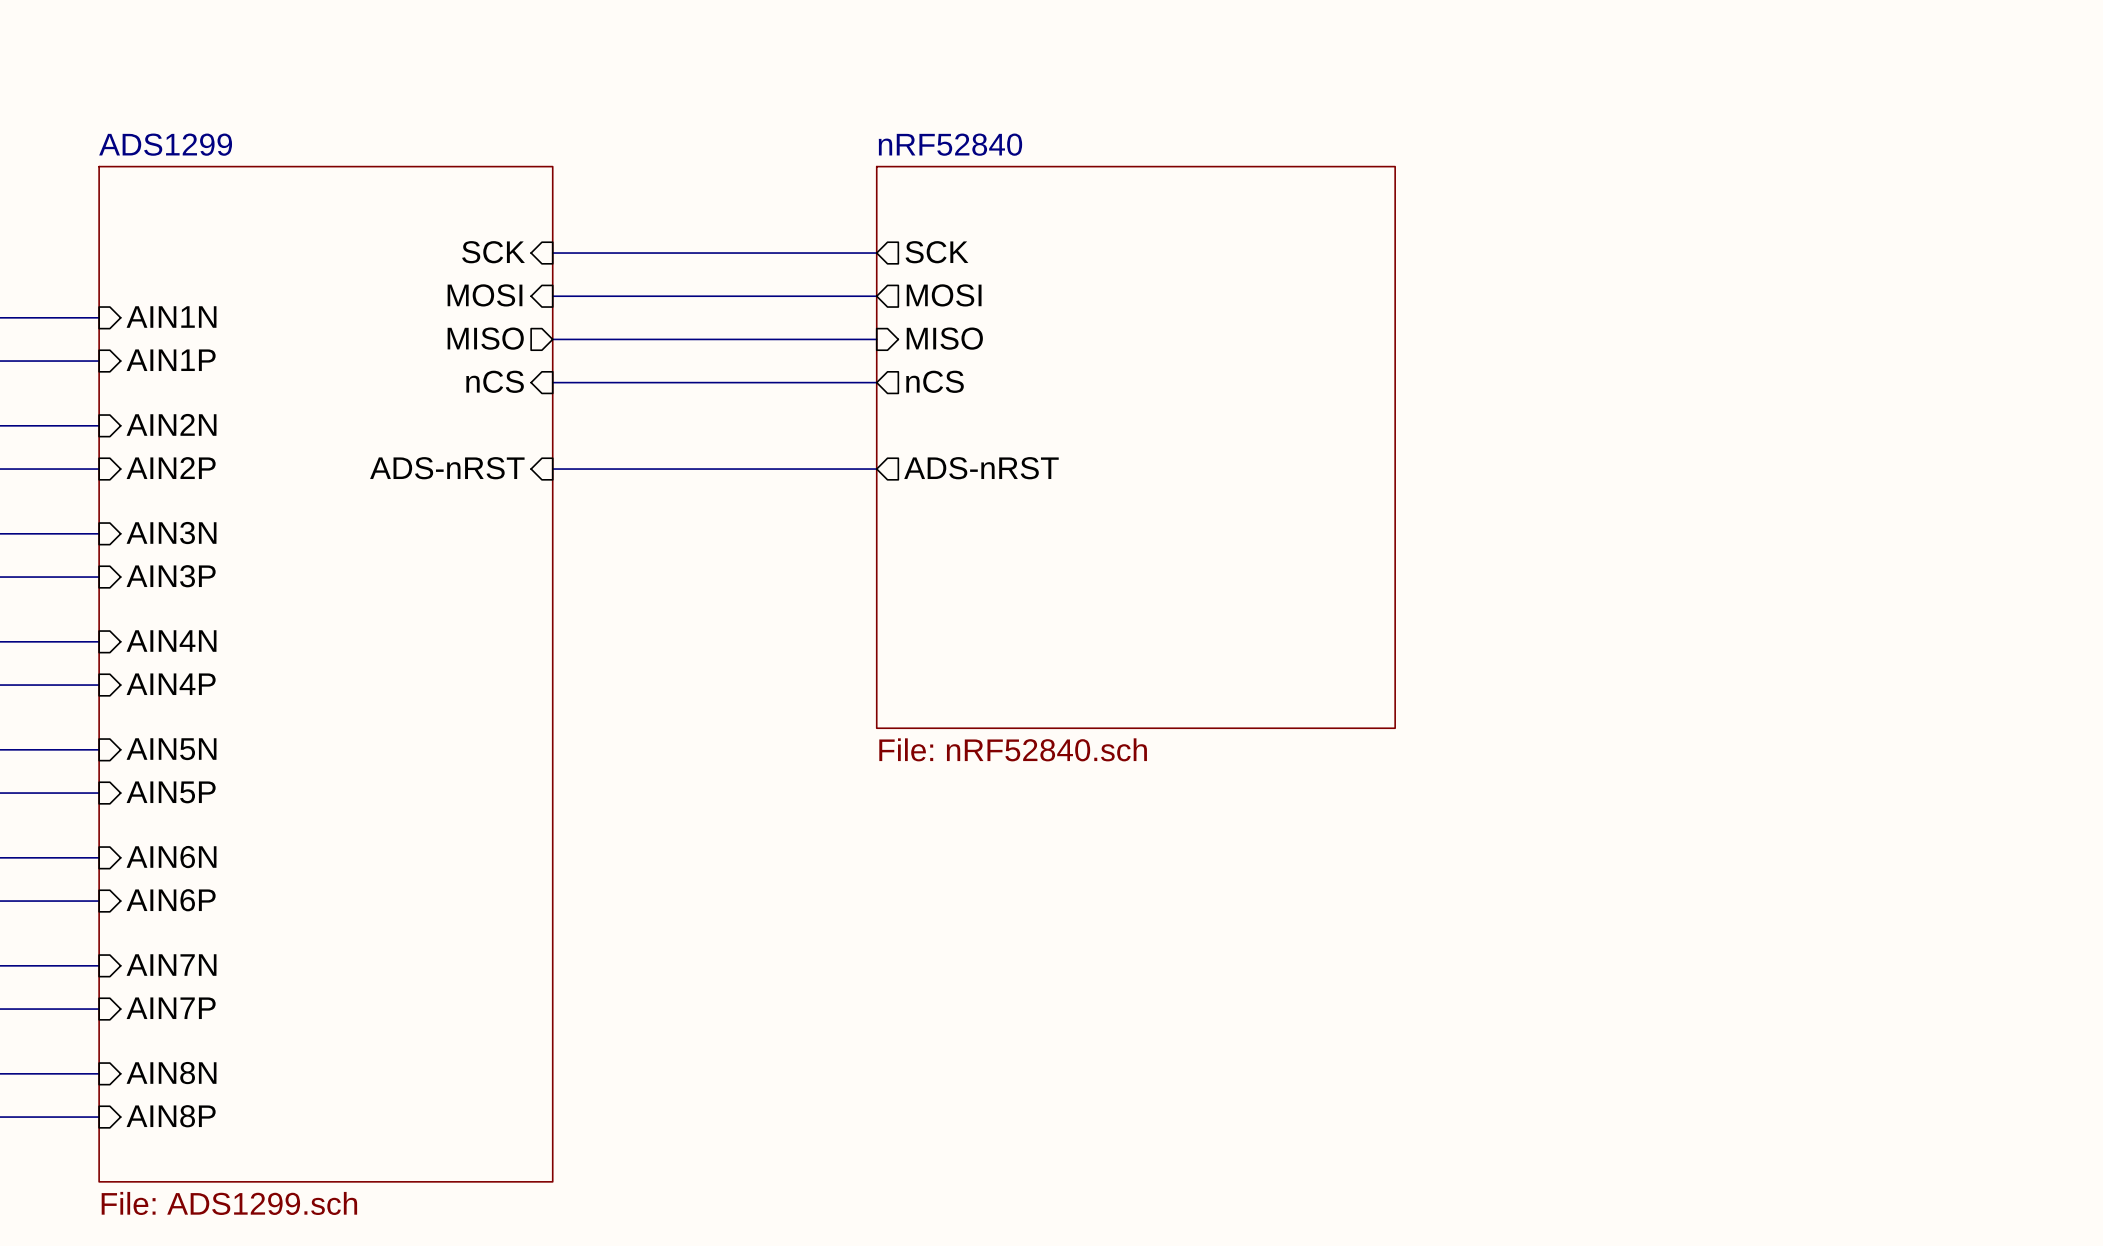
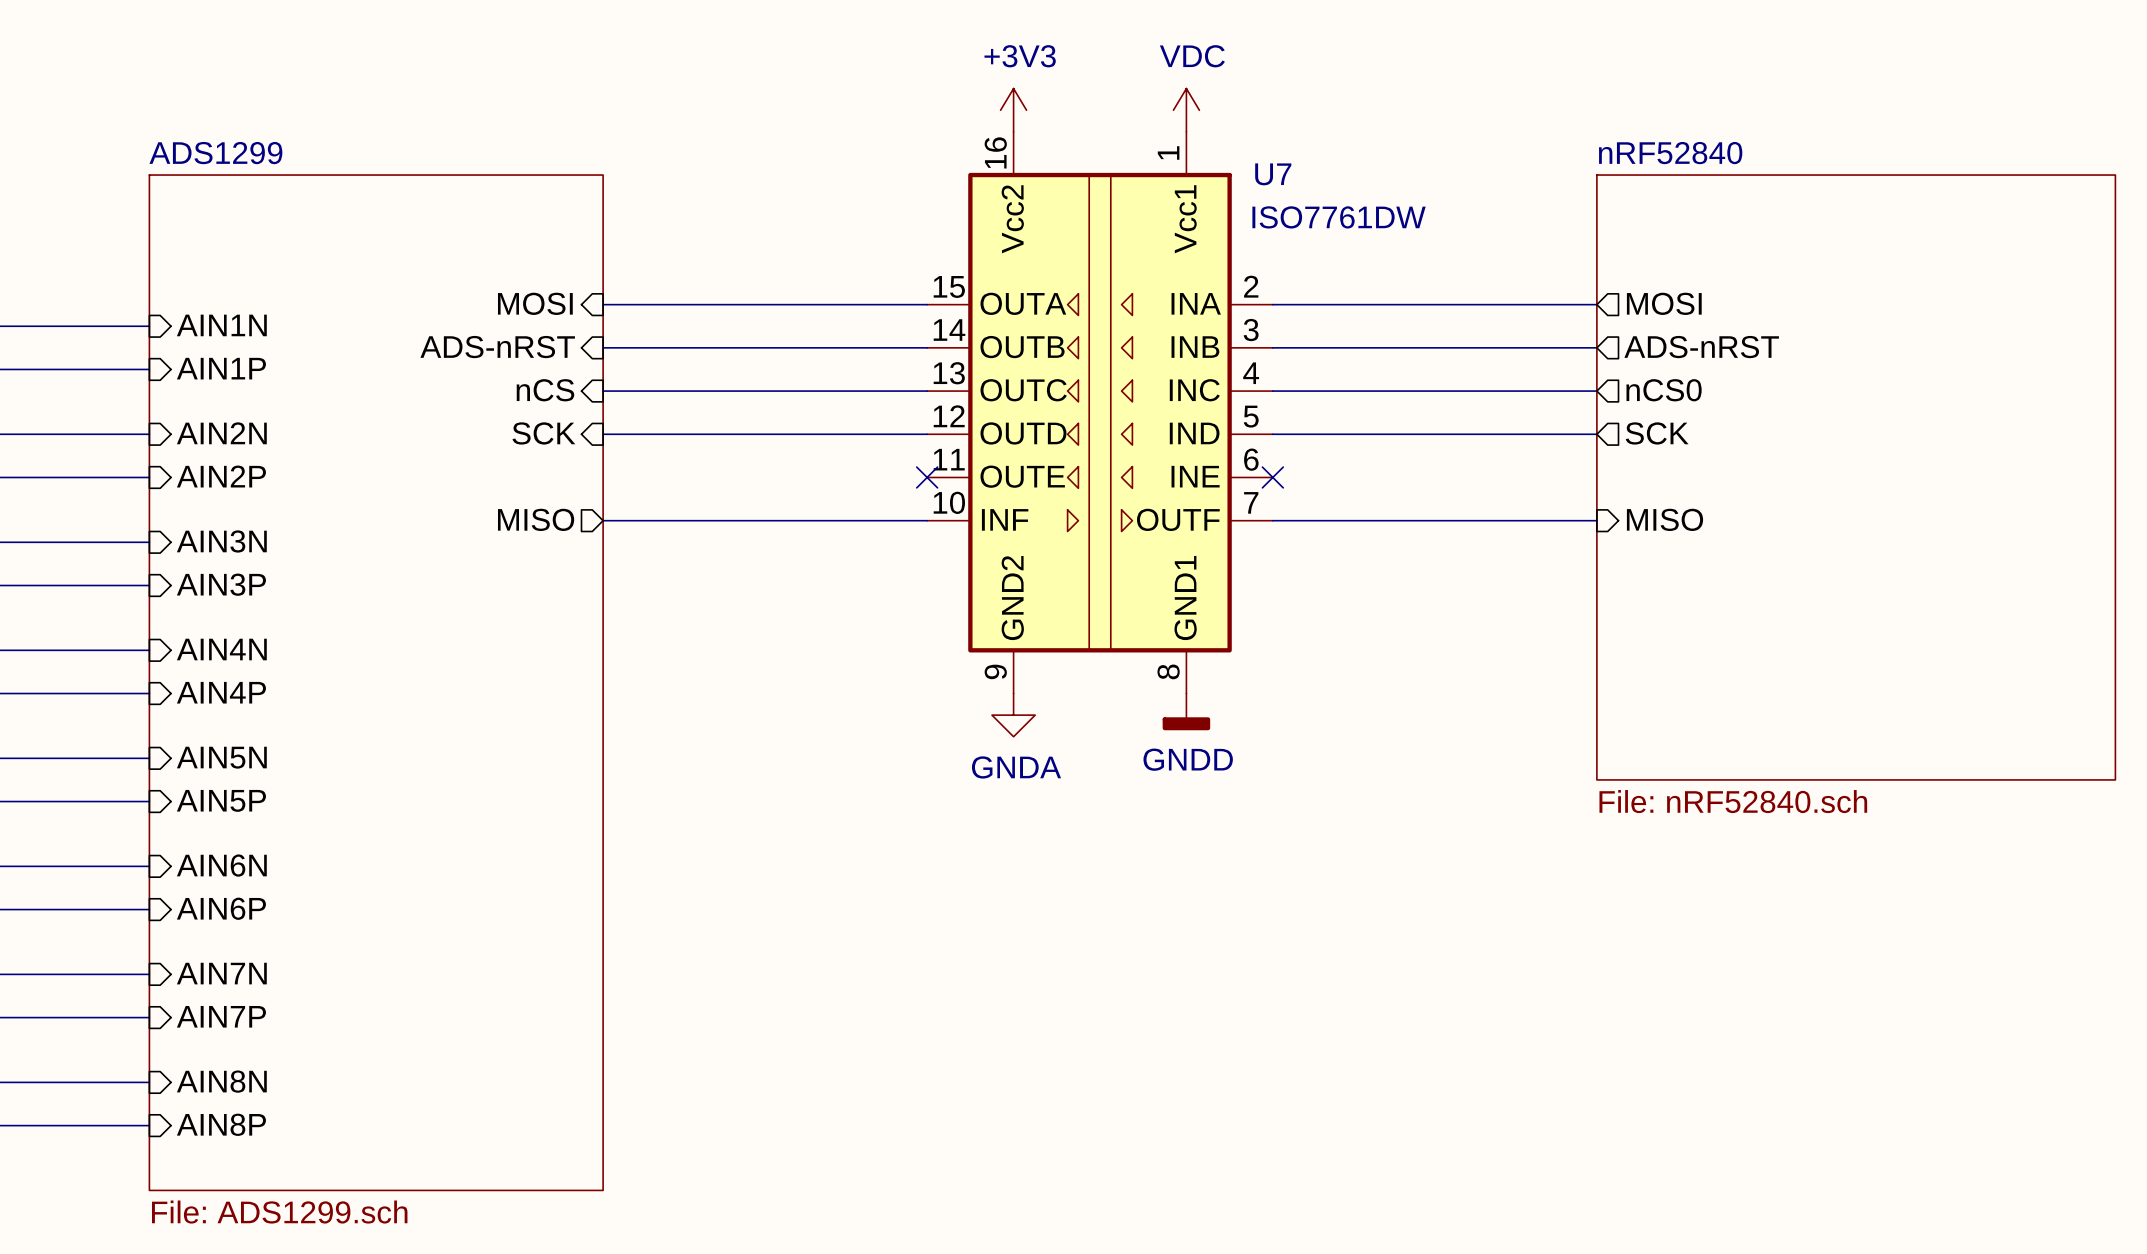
power symbol: none -> +3V3 (1013, 110)
power symbol: none -> VDC (1186, 110)
sheet nRF52840 shape: [876, 166, 1396, 729] -> [1596, 175, 2116, 780]
sheet pin position: SCK (493, 252) -> SCK (543, 433)
sheet pin: SCK (936, 252) -> none
wire: (552, 253) (876, 253) -> (603, 434) (927, 434)
sheet pin: MOSI (944, 295) -> none
sheet pin: none -> MOSI (1664, 303)
wire: none -> (1272, 304) (1596, 304)
sheet pin shape: output (485, 338) -> input (497, 347)
sheet pin: MISO (485, 338) -> ADS-nRST (497, 347)
sheet pin: MISO (944, 338) -> none
sheet pin: none -> ADS-nRST (1701, 347)
wire: none -> (1272, 347) (1596, 347)
sheet pin: nCS (935, 381) -> none
sheet pin: none -> nCS0 (1664, 390)
wire: none -> (1272, 391) (1596, 391)
U7: none -> ISO7761DW (1100, 412)
wire: none -> (1272, 434) (1596, 434)
sheet pin: none -> SCK (1657, 433)
sheet pin: ADS-nRST (447, 468) -> none
sheet pin: ADS-nRST (981, 468) -> none
wire: (552, 469) (876, 469) -> (603, 520) (927, 520)
no-connect mark: none -> (927, 477)
no-connect mark: none -> (1272, 477)
sheet pin: none -> MISO (536, 519)
sheet pin: none -> MISO (1665, 519)
wire: none -> (1272, 520) (1596, 520)
power symbol: none -> GNDD (1186, 711)
power symbol: none -> GNDA (1013, 715)

